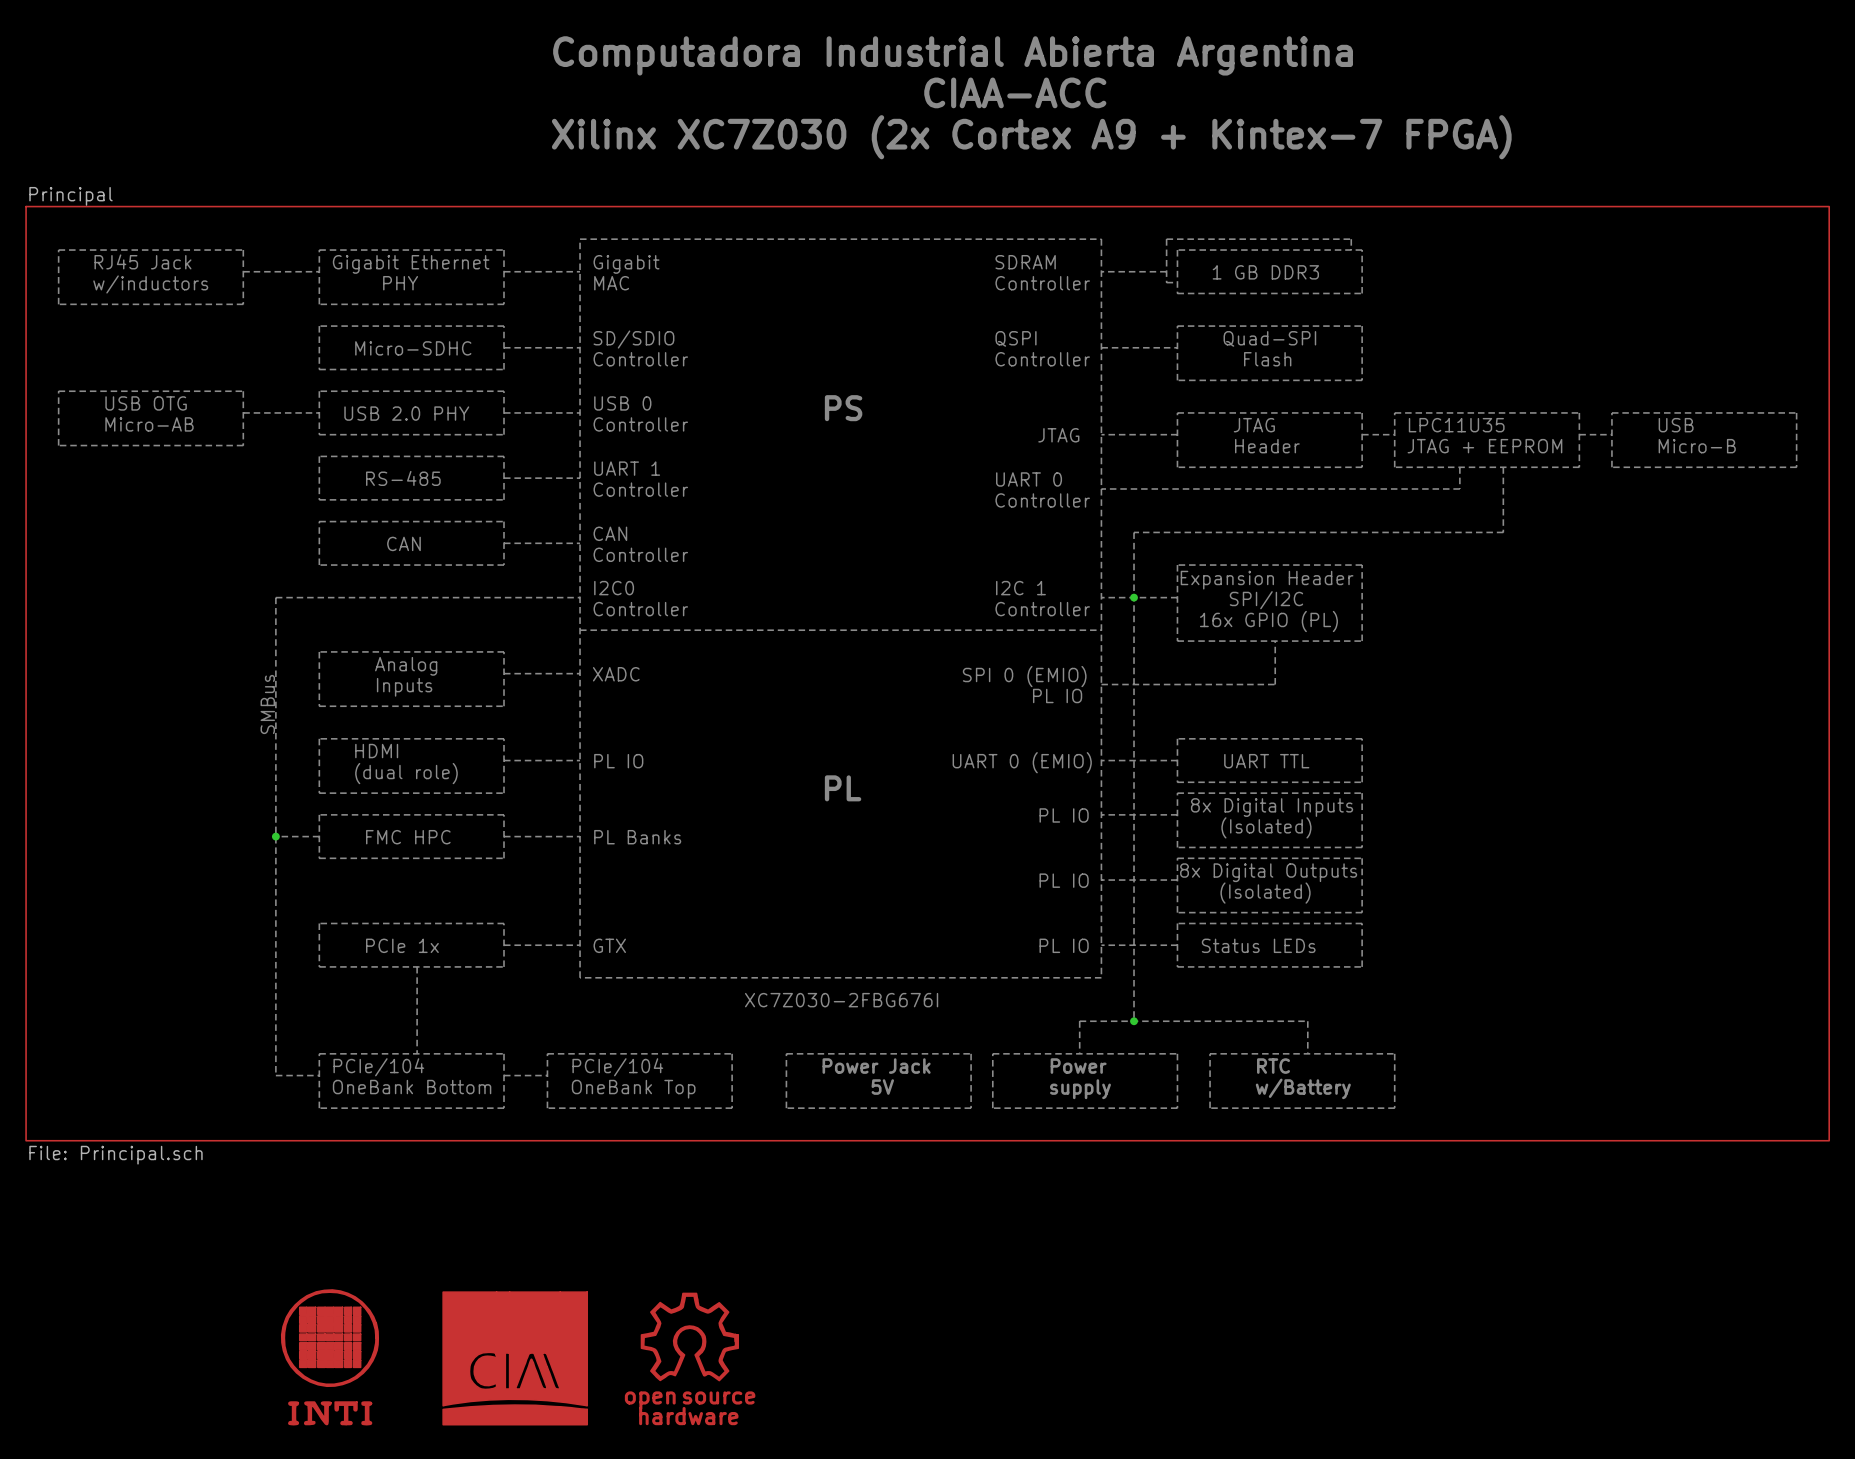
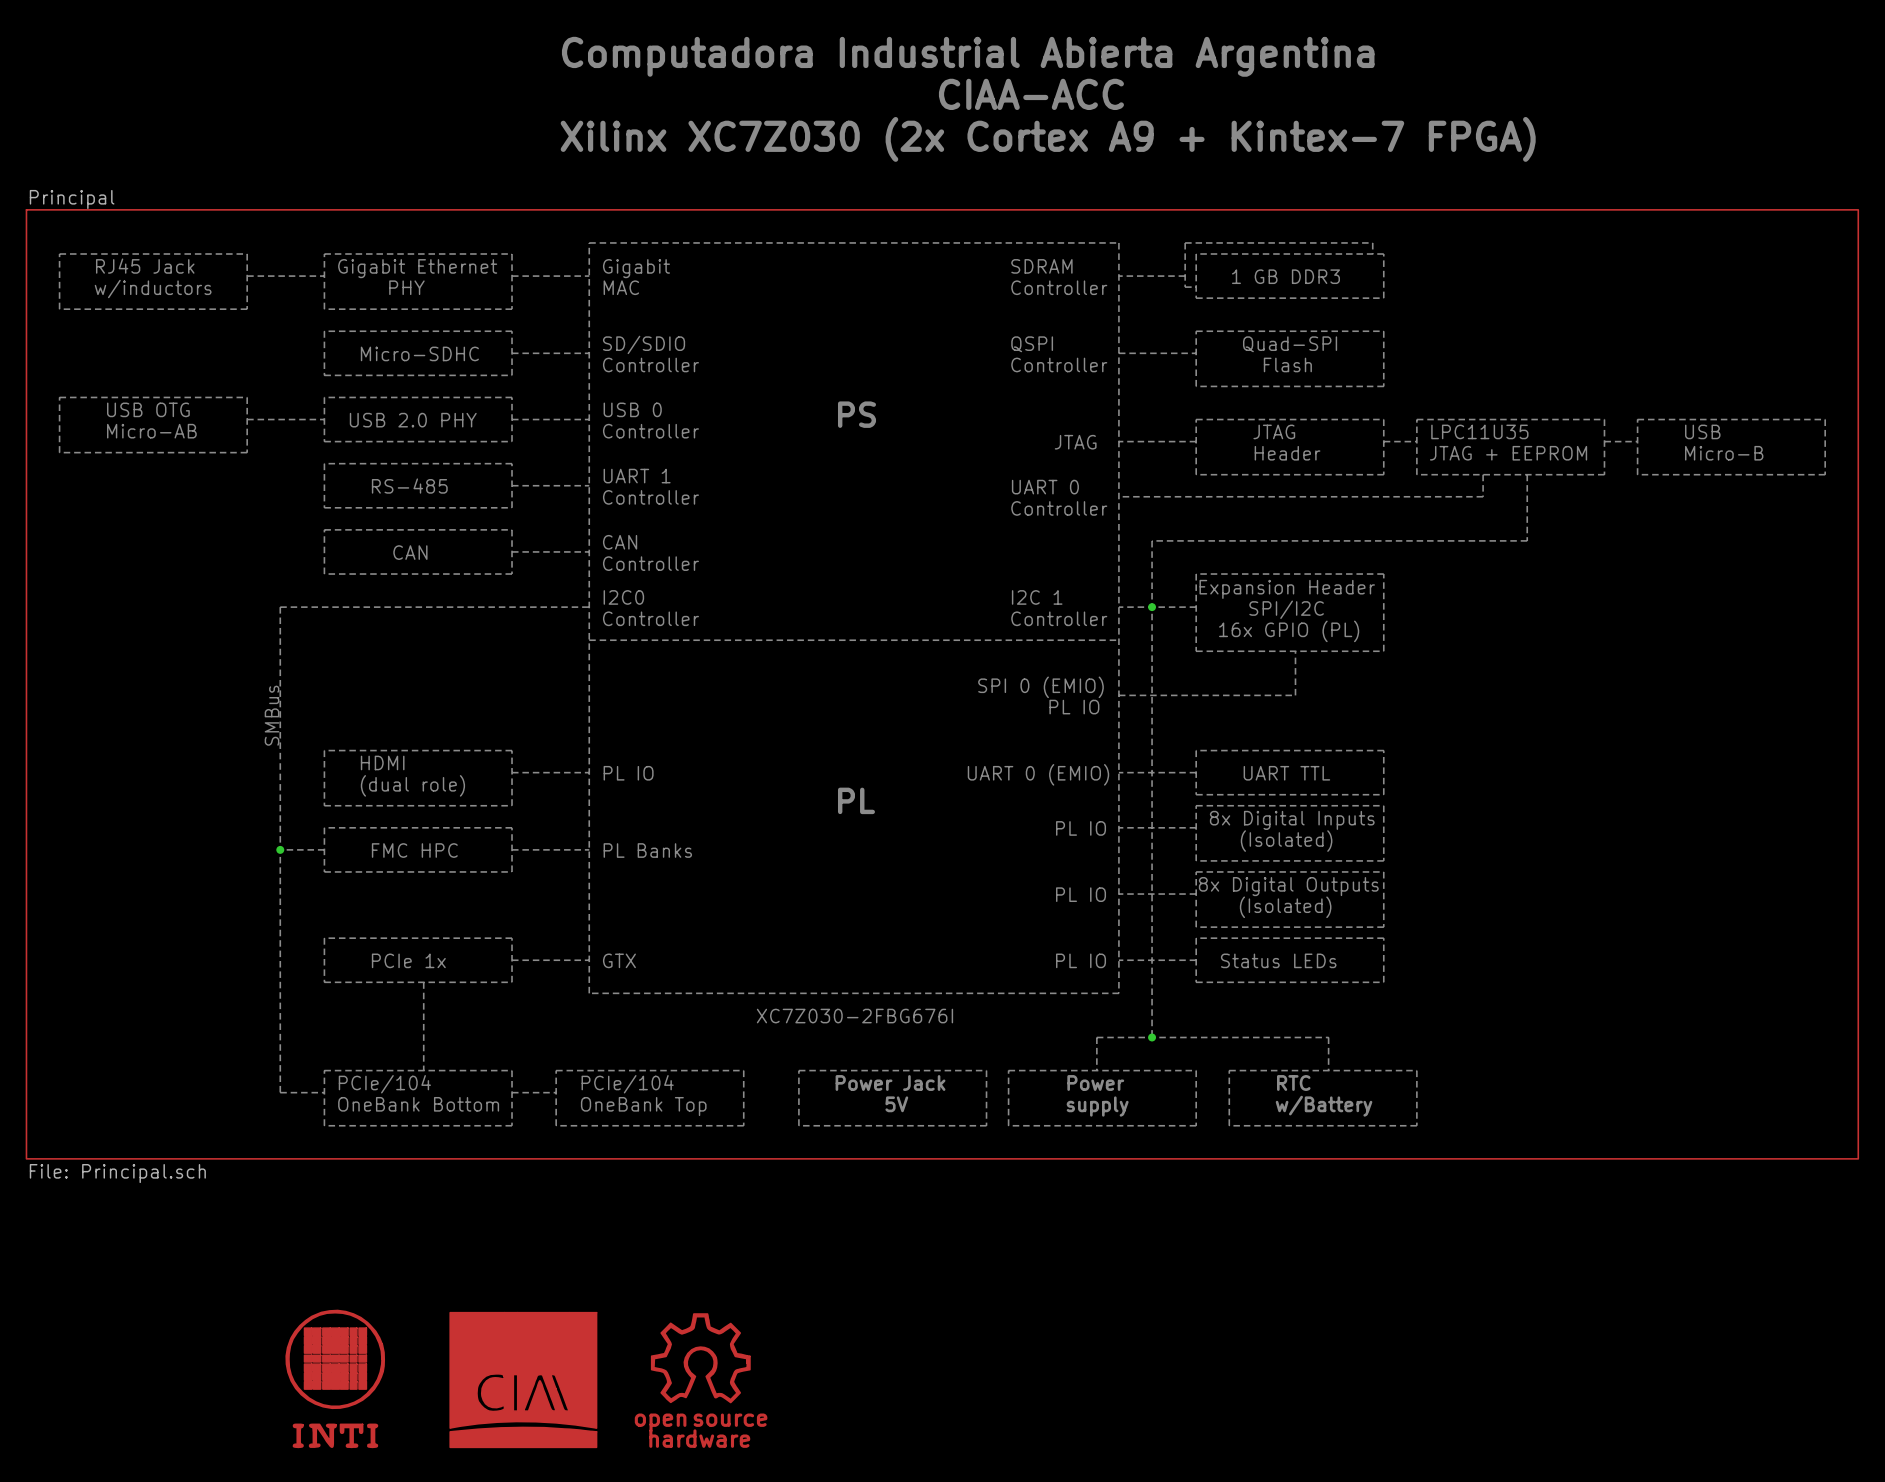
line: (319, 651) (319, 706) (503, 706) (503, 651) (319, 651) -> none
text: Analog (406, 666) -> none
line: (503, 673) (580, 673) -> none
text: XADC (616, 674) -> none
text: Inputs (404, 687) -> none

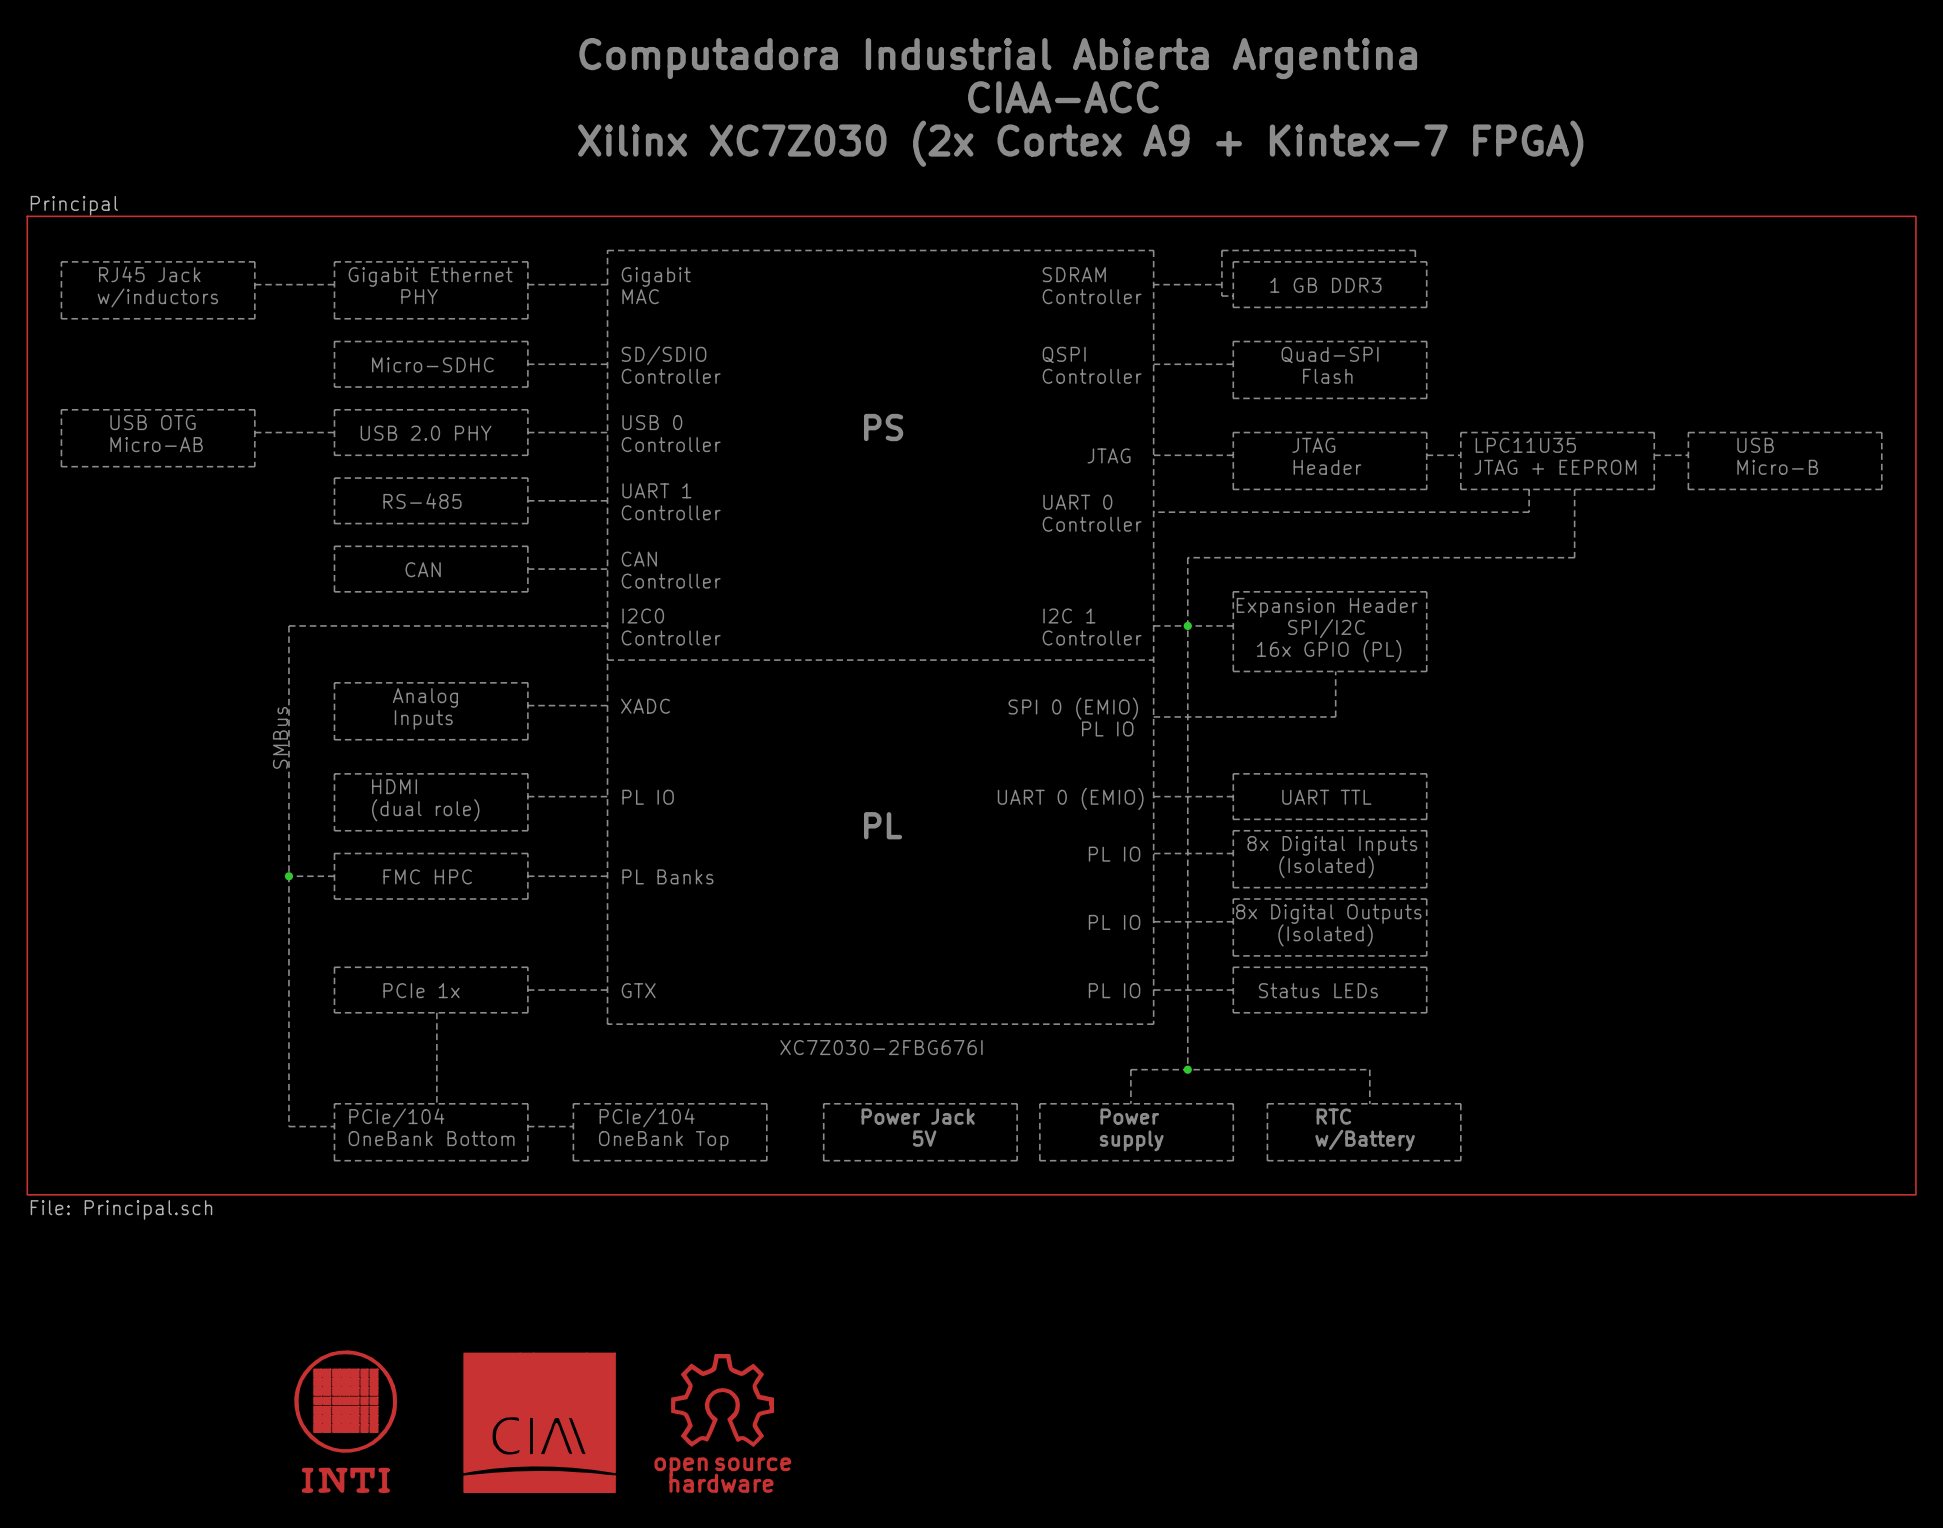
line: none -> (334, 682) (334, 739) (527, 739) (527, 682) (334, 682)
text: none -> Analog (425, 697)
line: none -> (527, 705) (607, 705)
text: none -> XADC (645, 706)
text: none -> Inputs (423, 719)

